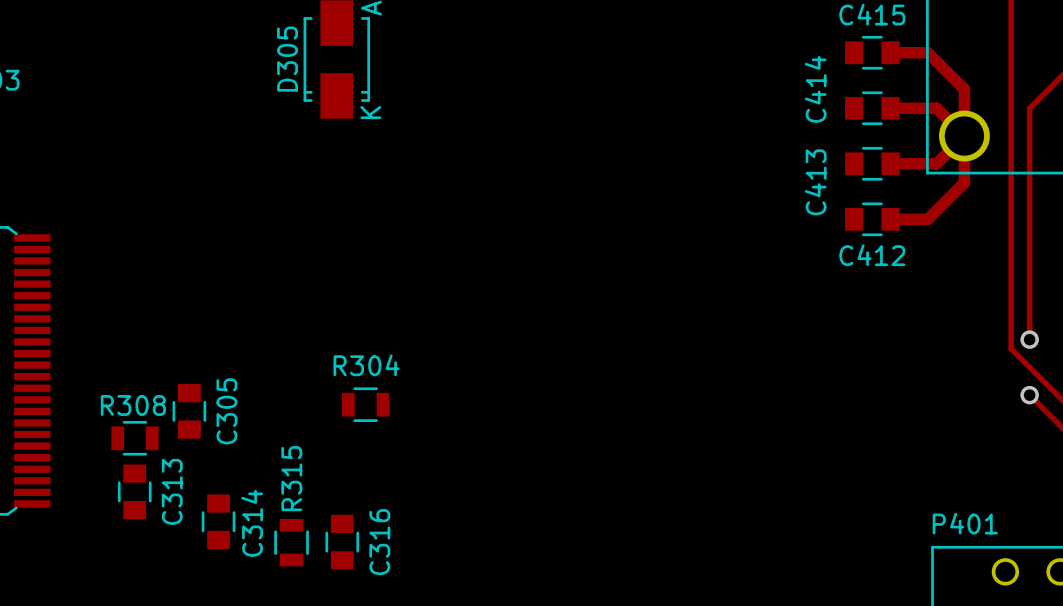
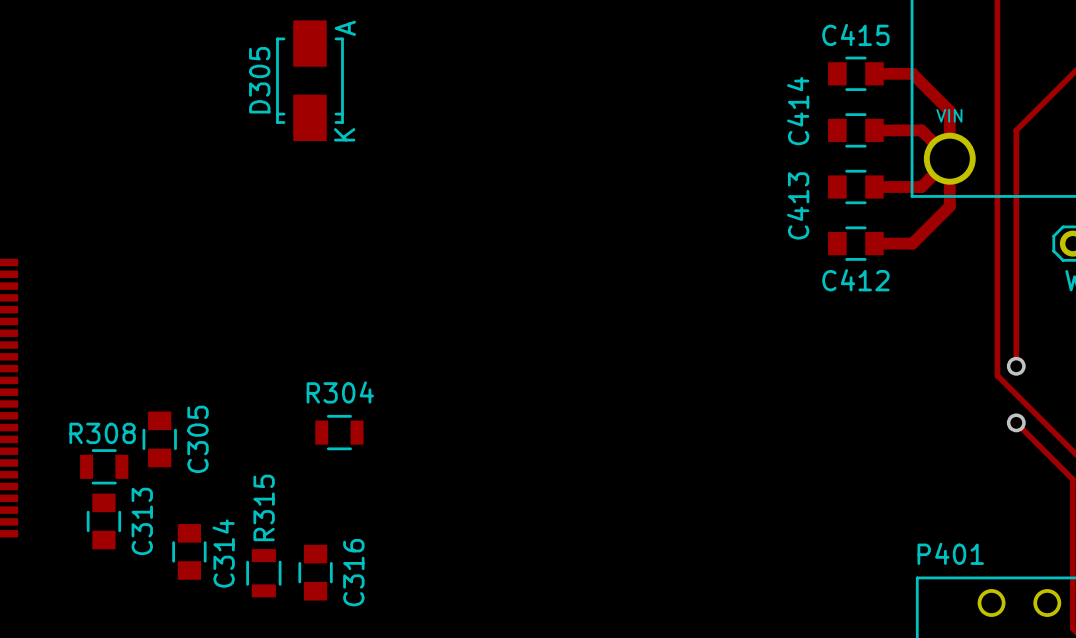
part text: none -> VIN (949, 115)

